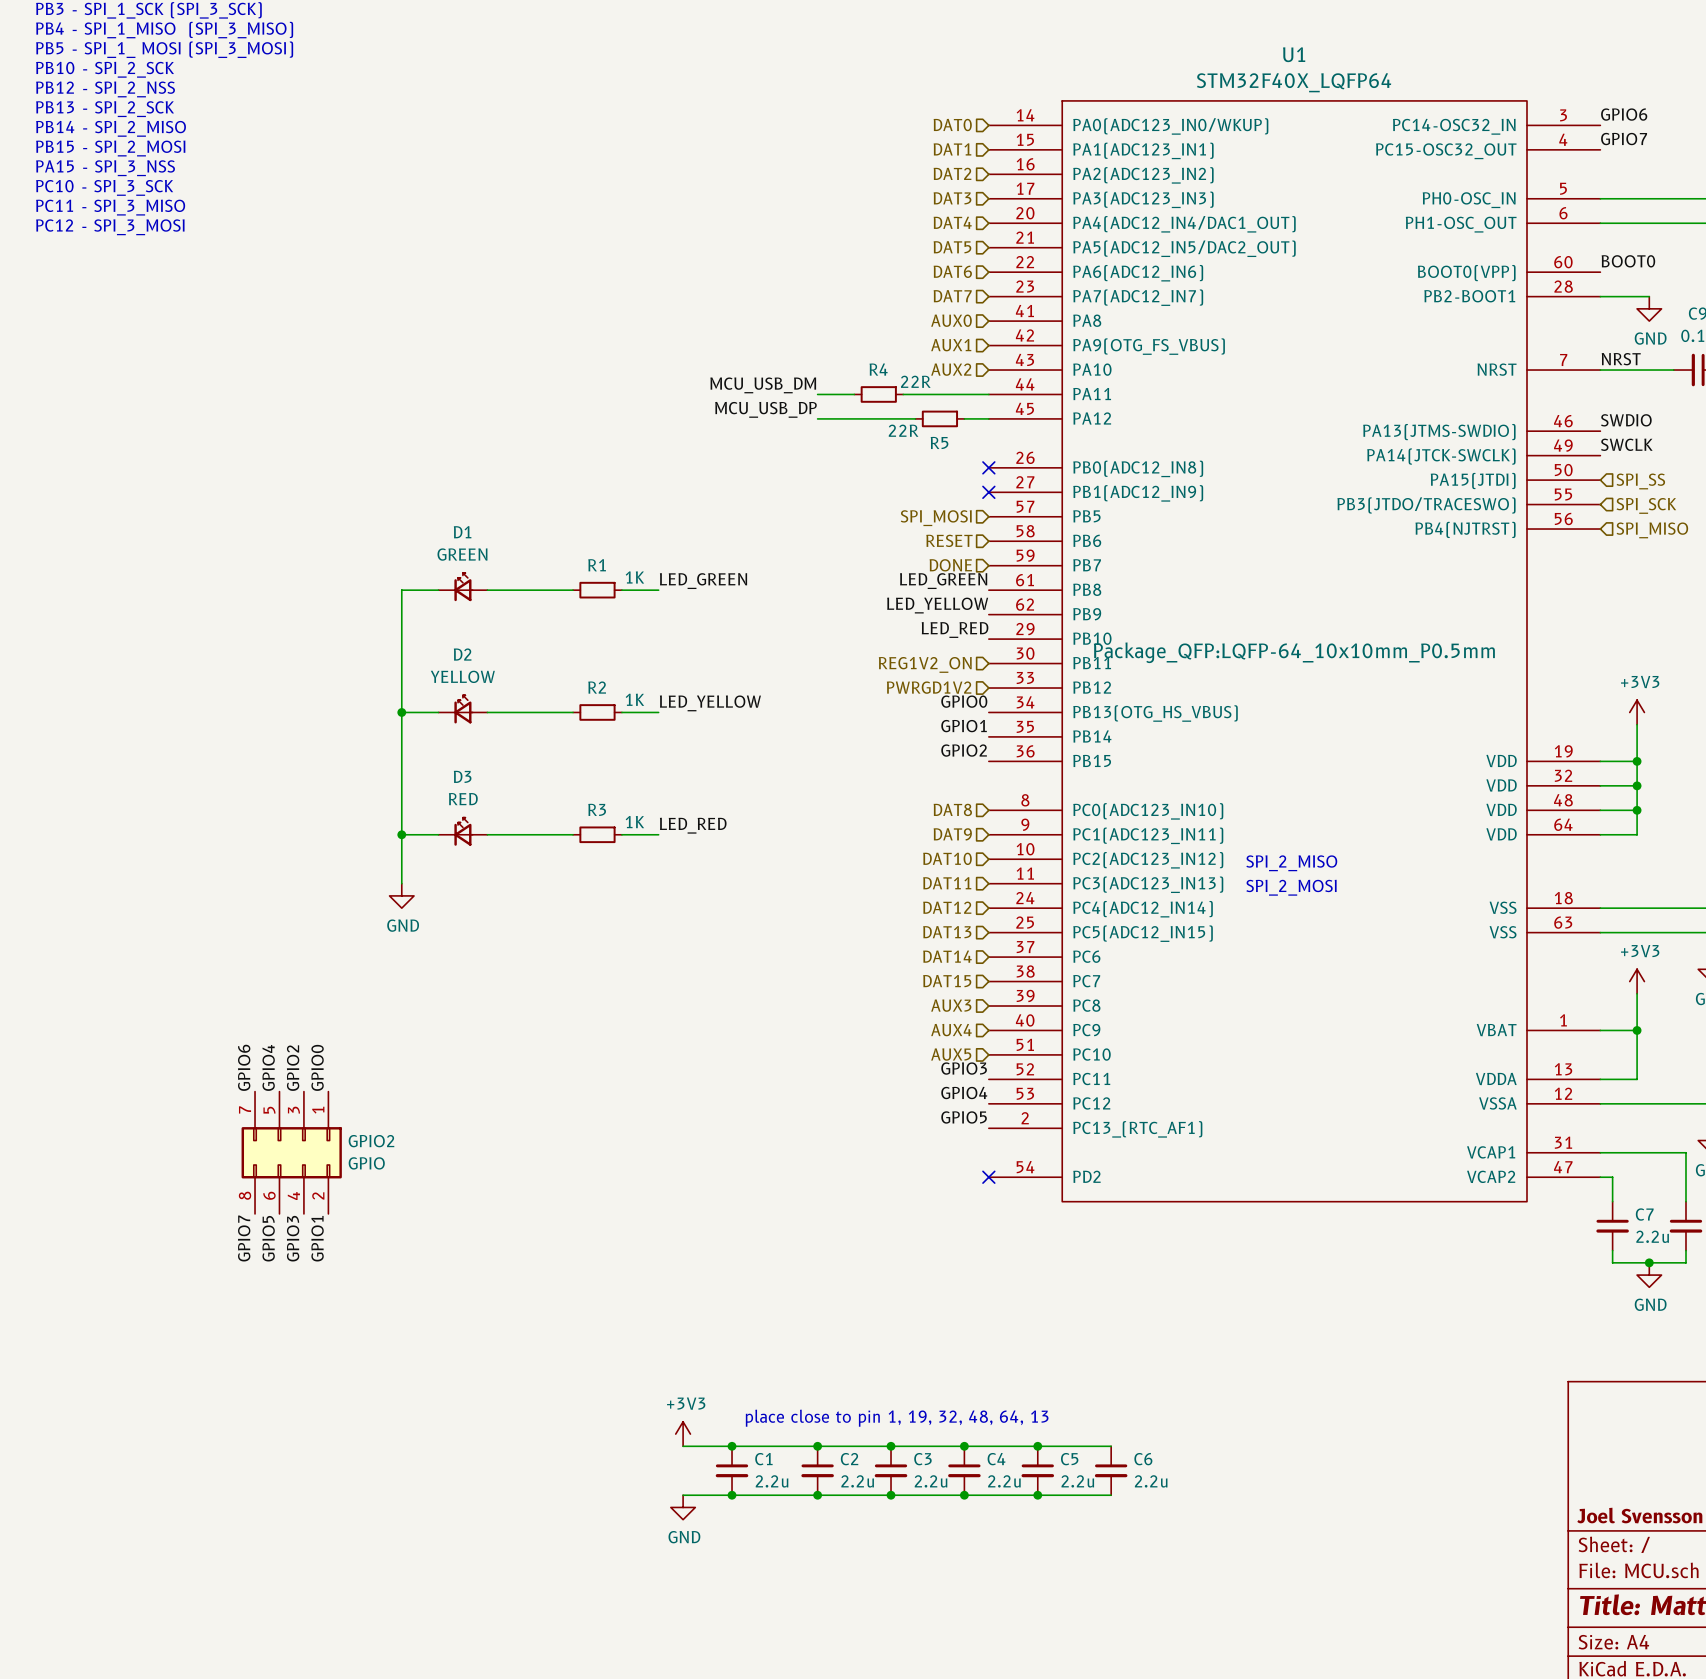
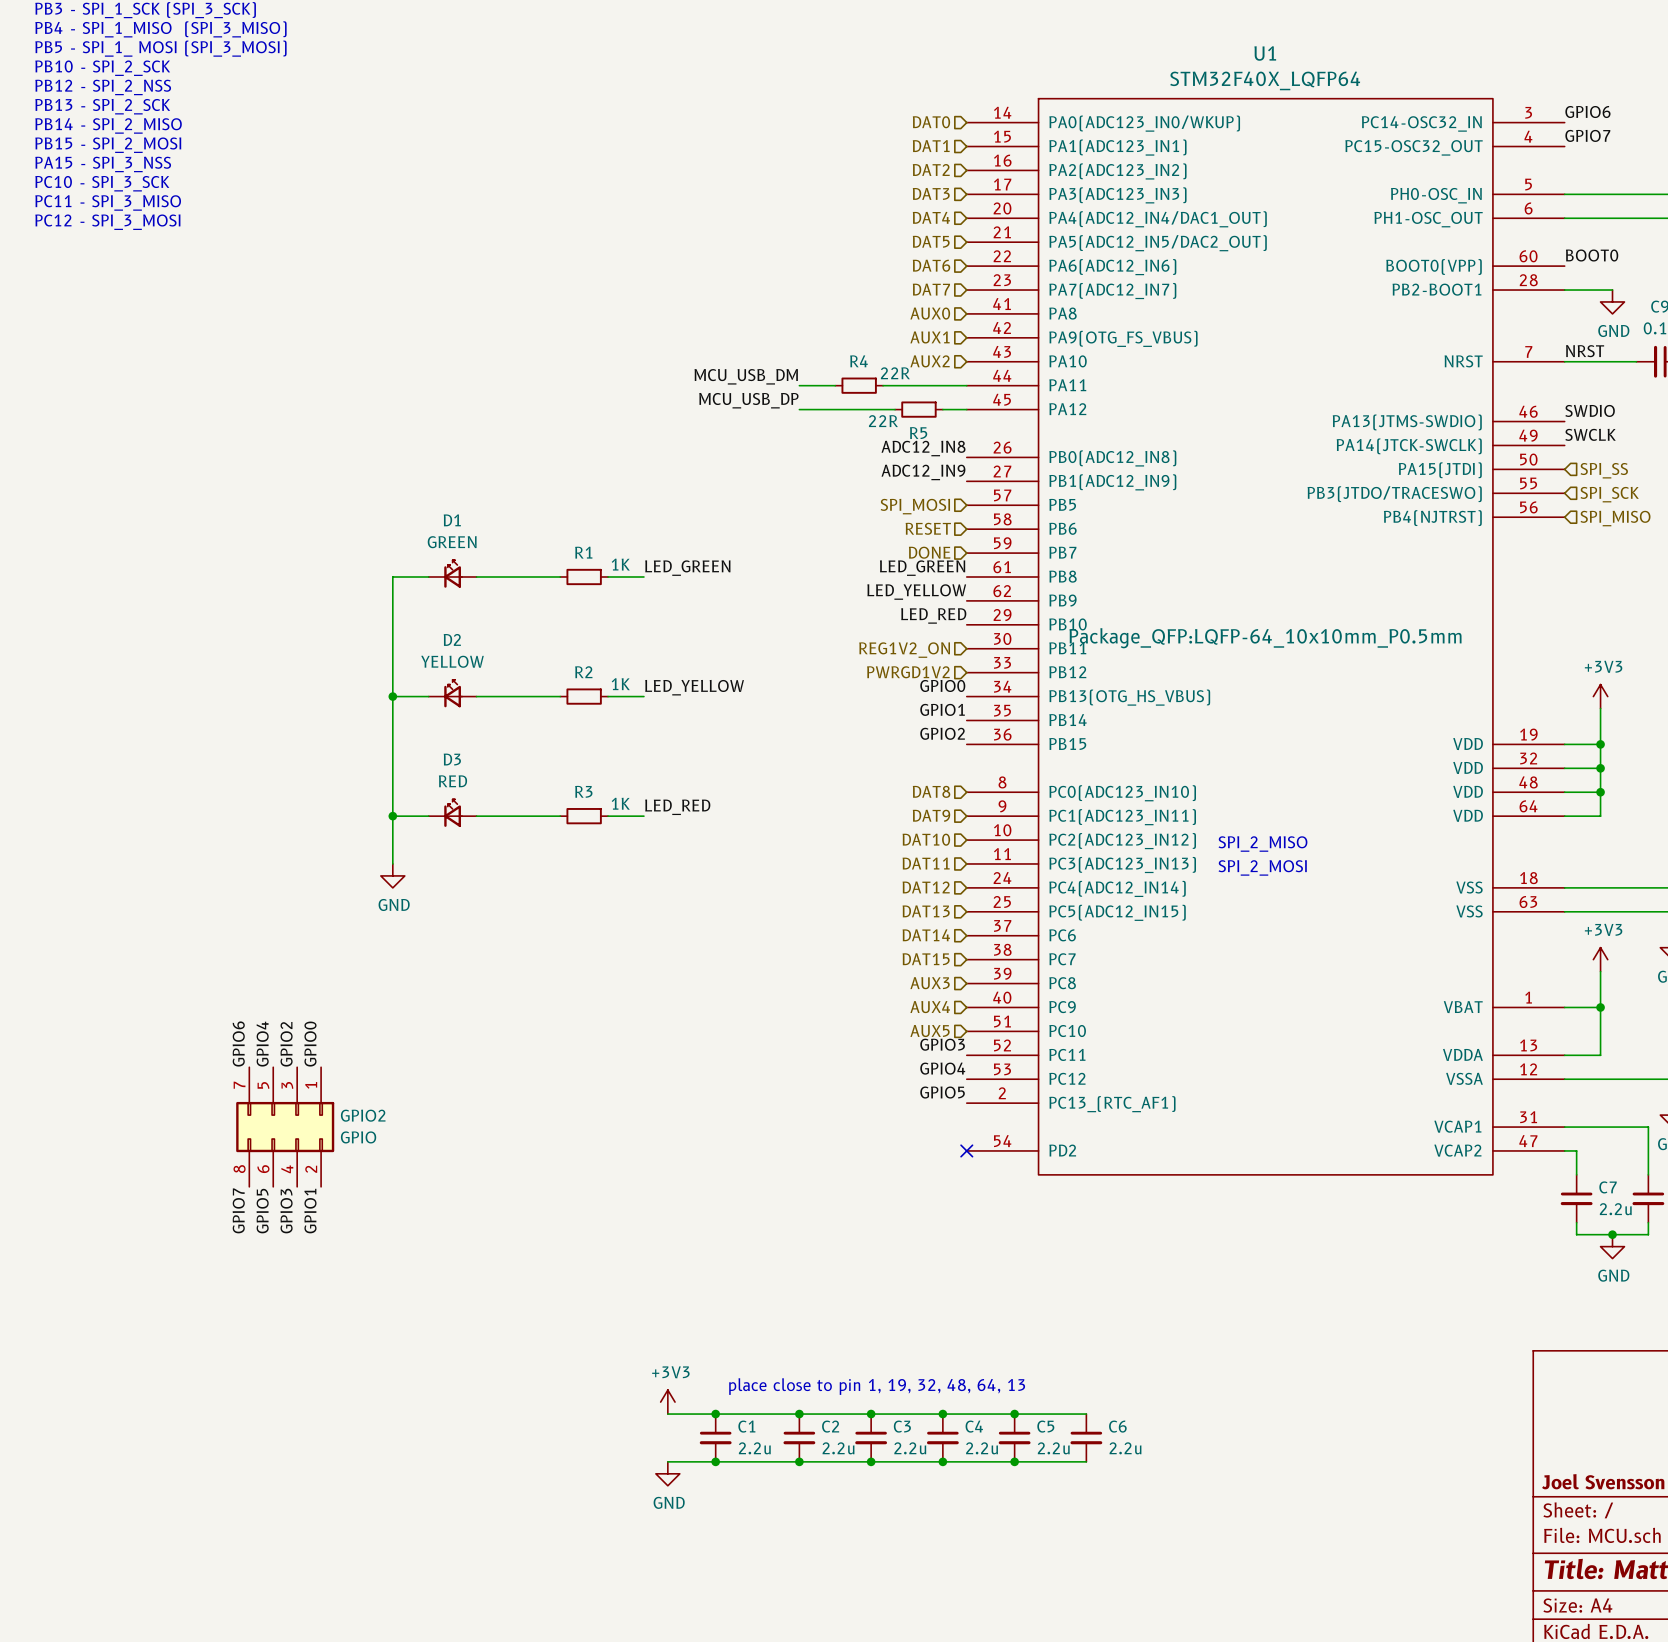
label: none -> ADC12_IN8 (923, 448)
no-connect mark: (988, 467) -> none
label: none -> ADC12_IN9 (923, 472)
no-connect mark: (988, 492) -> none

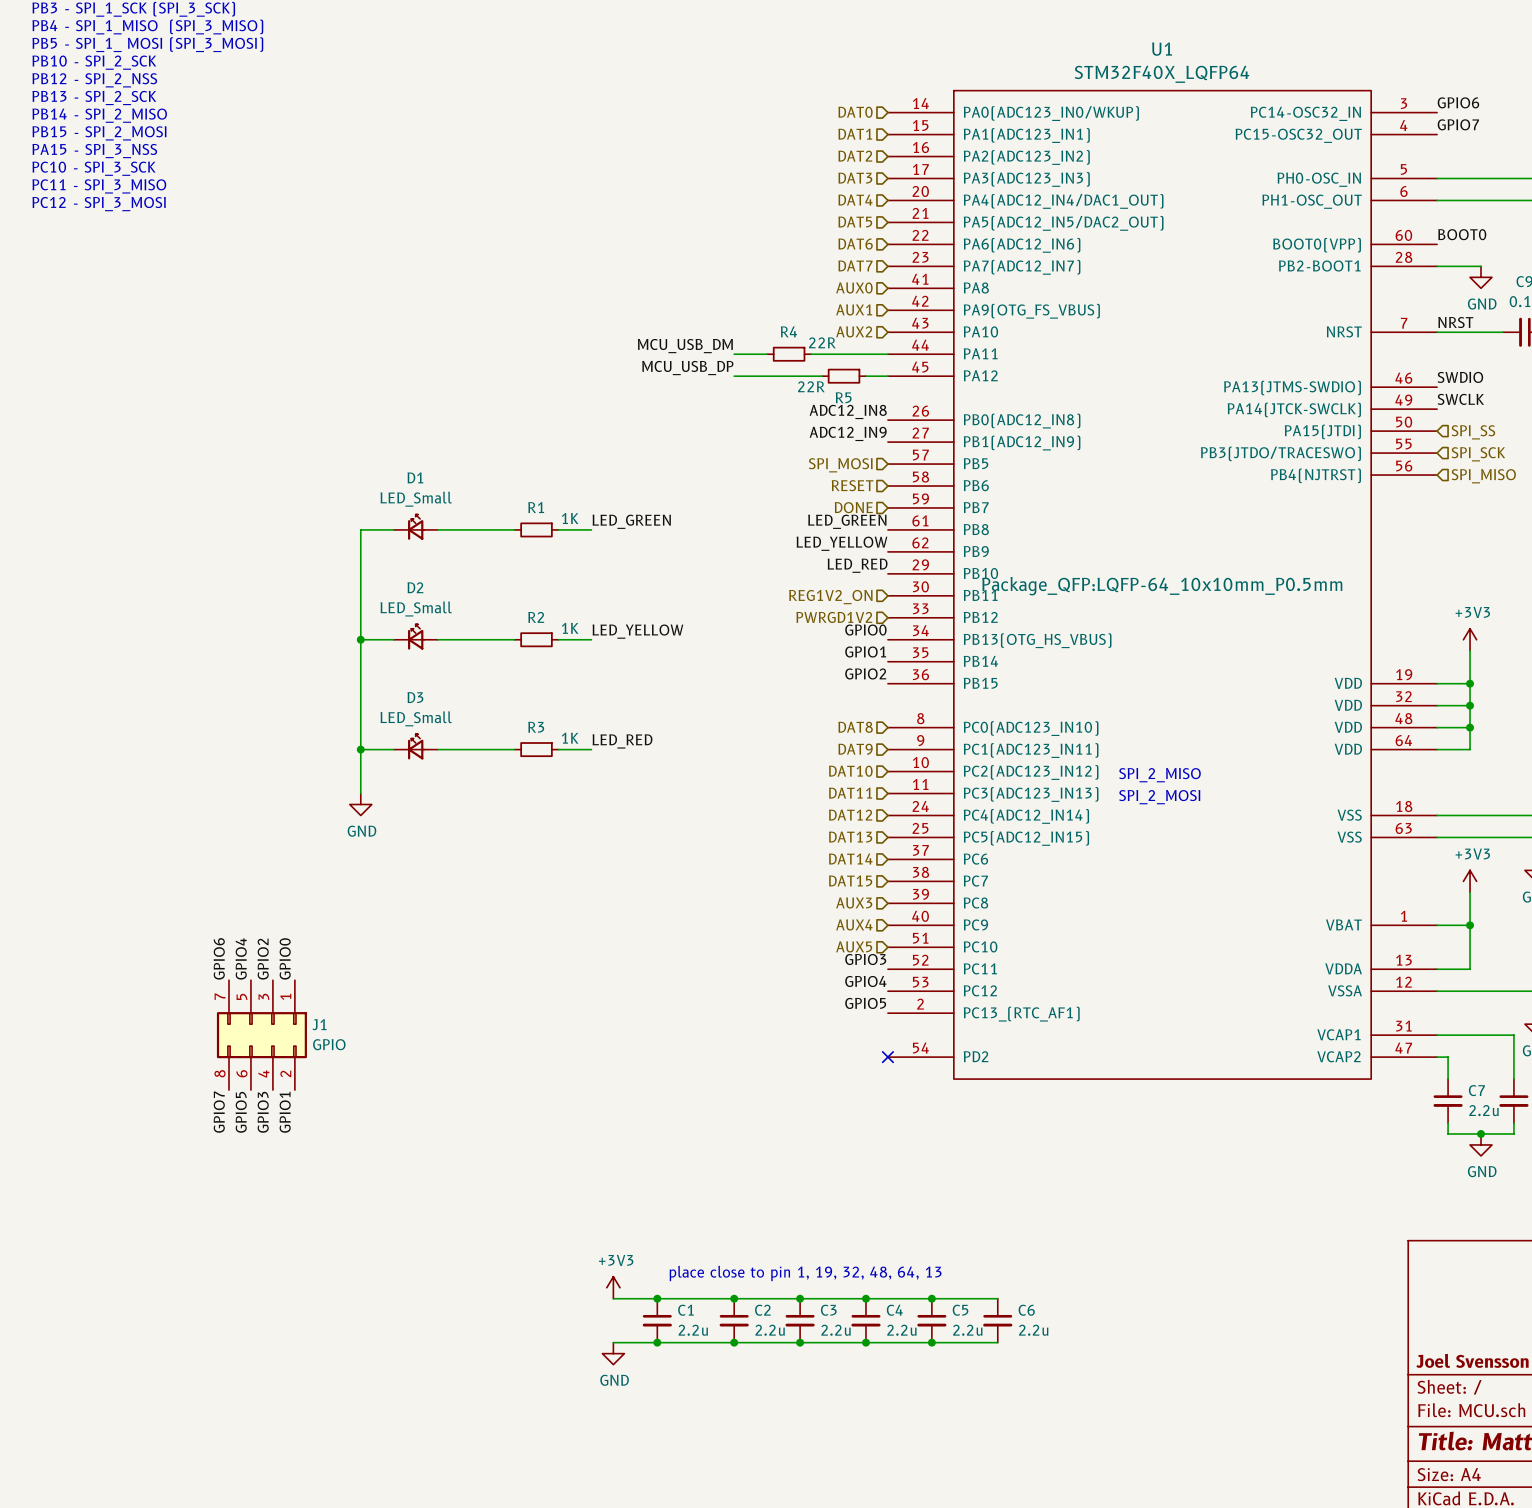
D1 value: GREEN (452, 542) -> LED_Small (416, 499)
D2 value: YELLOW (452, 661) -> LED_Small (416, 609)
D3 value: RED (452, 781) -> LED_Small (416, 718)
GPIO2 name: GPIO2 (363, 1115) -> J1 (319, 1024)

